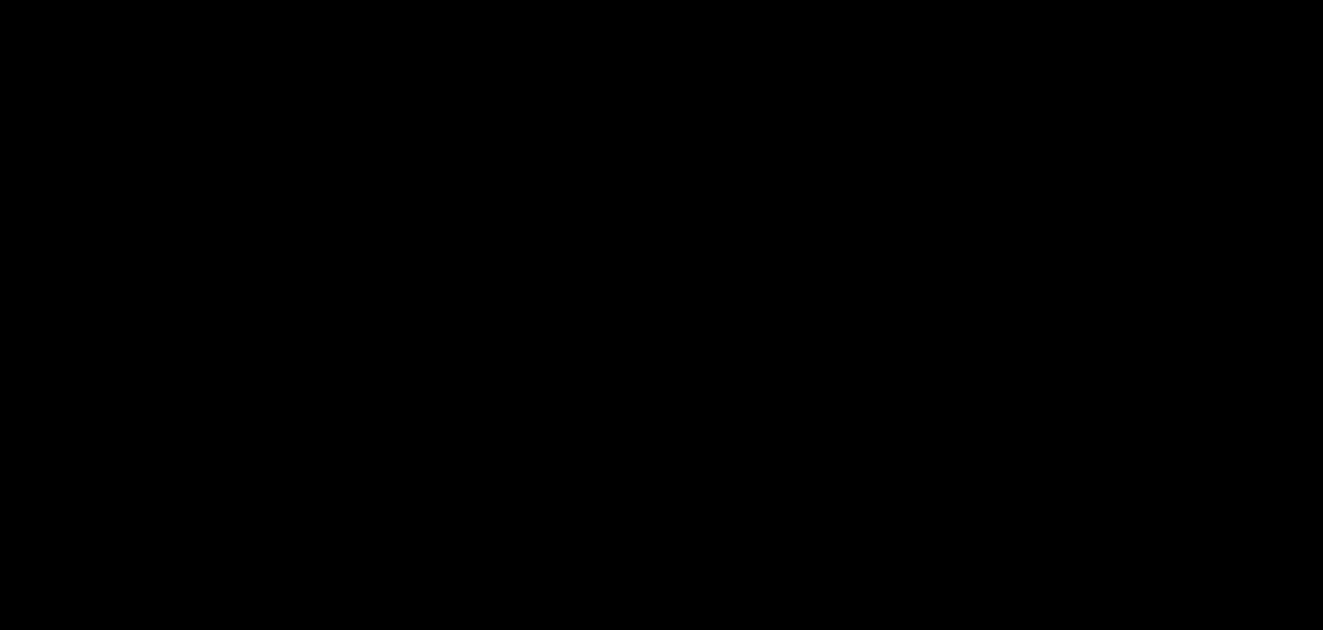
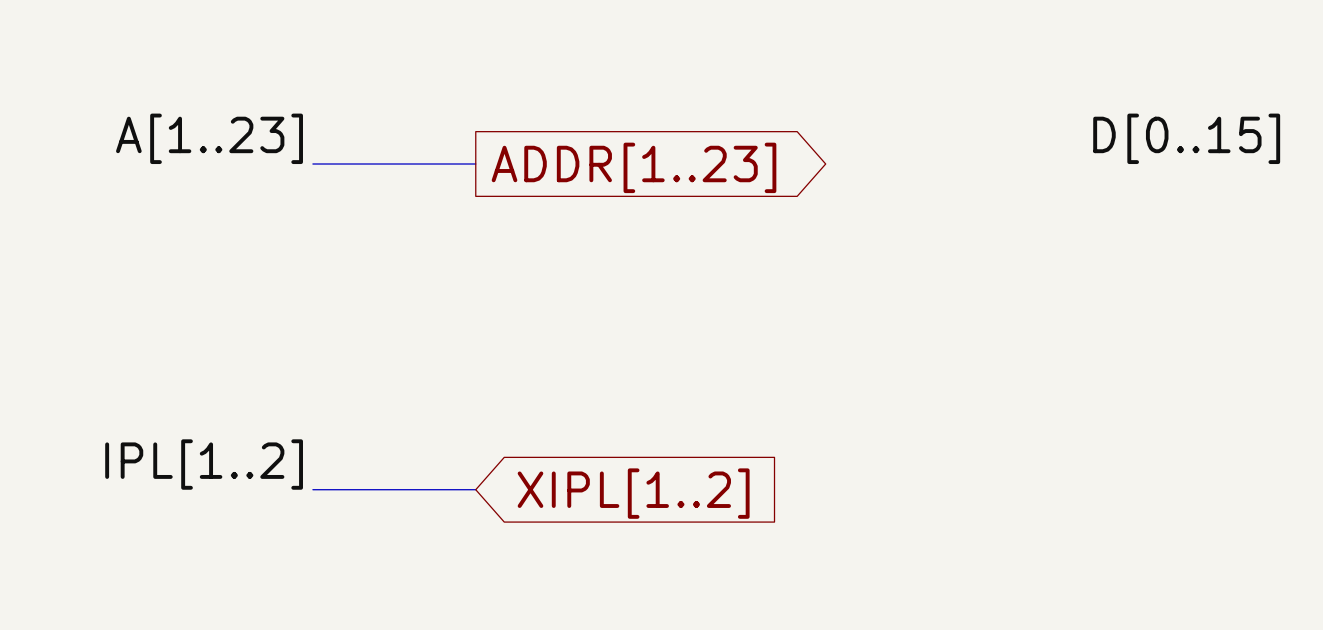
label: none -> A[1..23] (209, 138)
label: none -> D[0..15] (1186, 138)
bus: none -> (312, 164) (475, 164)
global label: none -> ADDR[1..23] (634, 167)
label: none -> IPL[1..2] (204, 464)
bus: none -> (312, 489) (475, 489)
global label: none -> XIPL[1..2] (633, 493)

